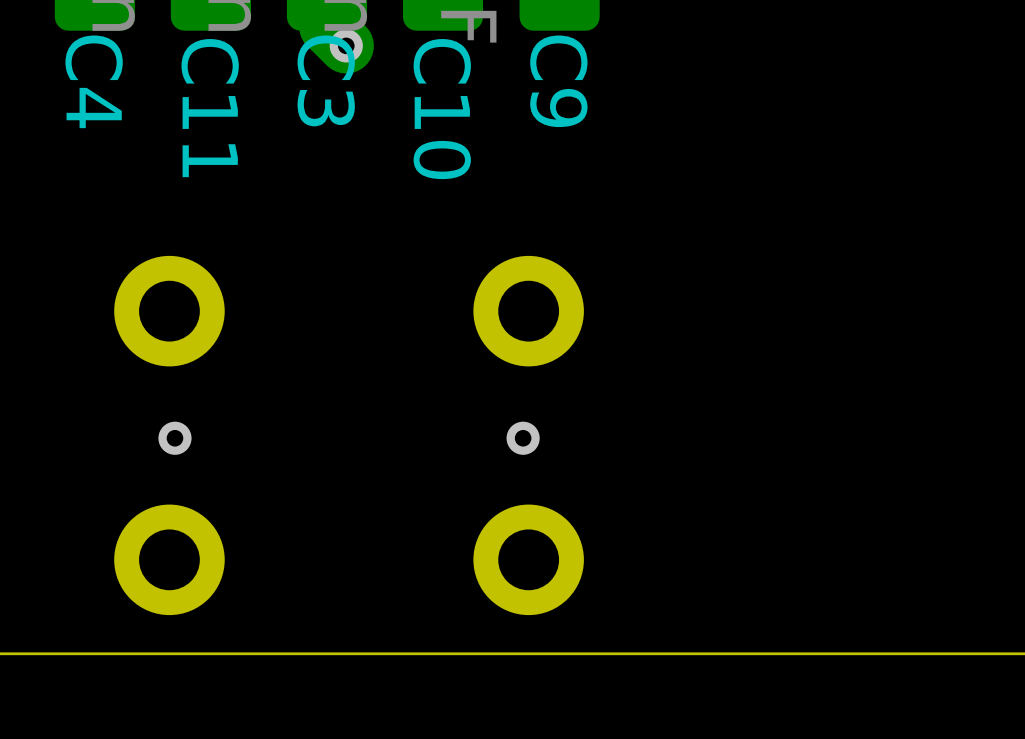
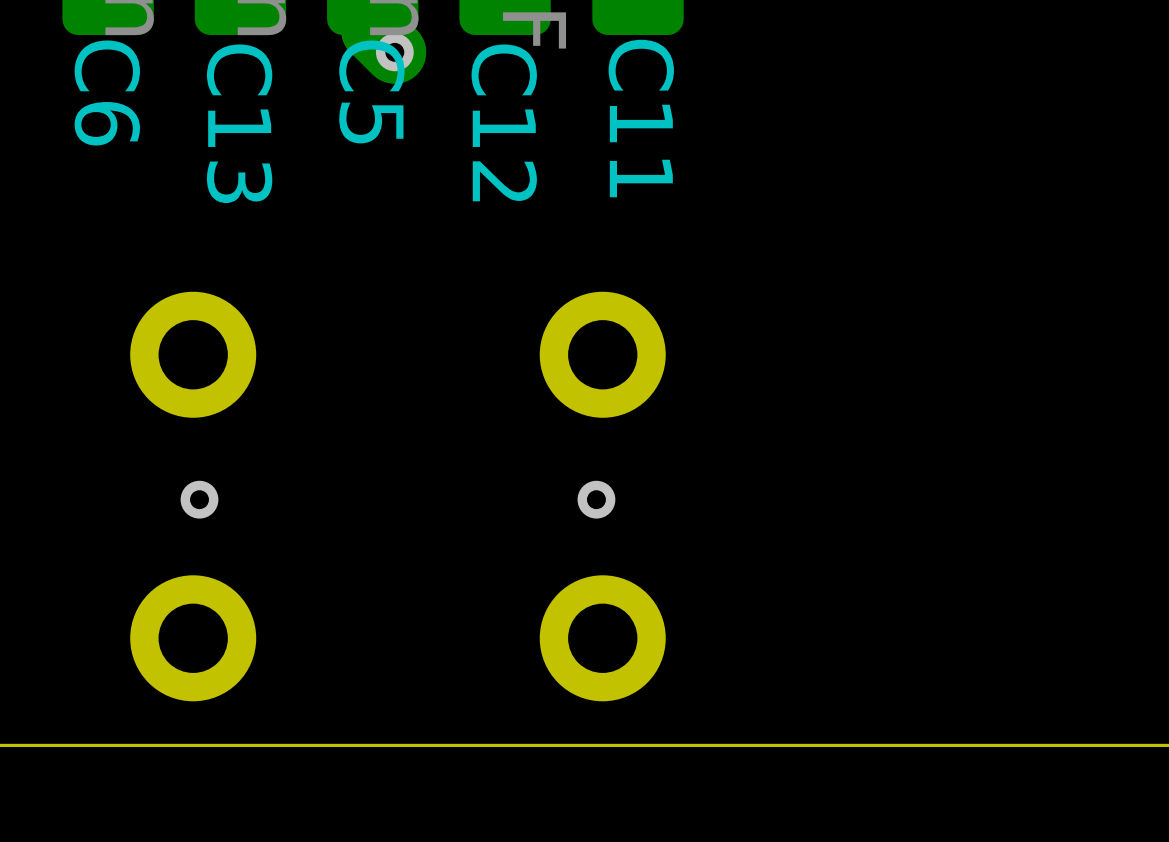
C3 name: C3 (326, 80) -> C5 (371, 91)
C4 name: C4 (94, 81) -> C6 (107, 92)
C9 name: C9 (558, 81) -> C11 (641, 118)
C11 name: C11 (210, 108) -> C13 (239, 123)
C10 name: C10 (442, 109) -> C12 (504, 122)

